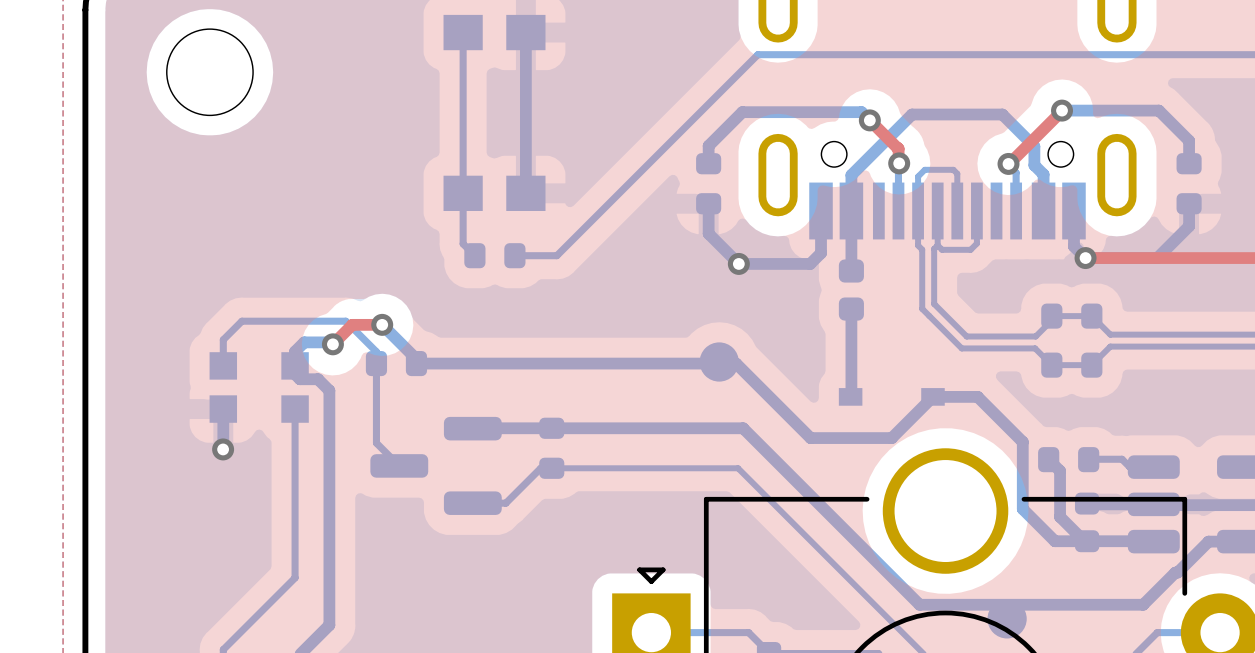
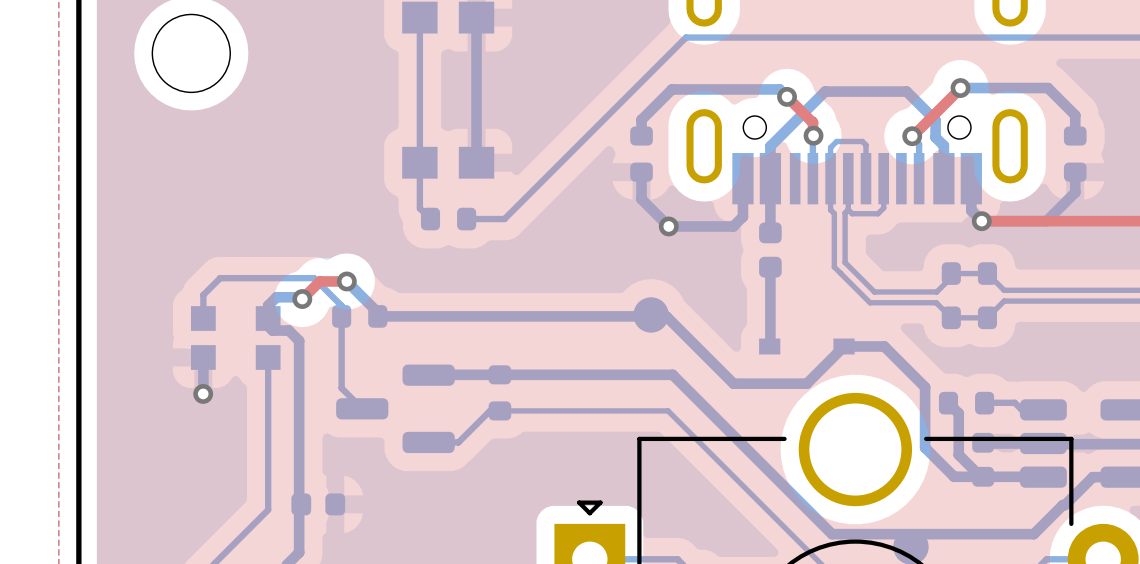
part: none -> (318, 504)

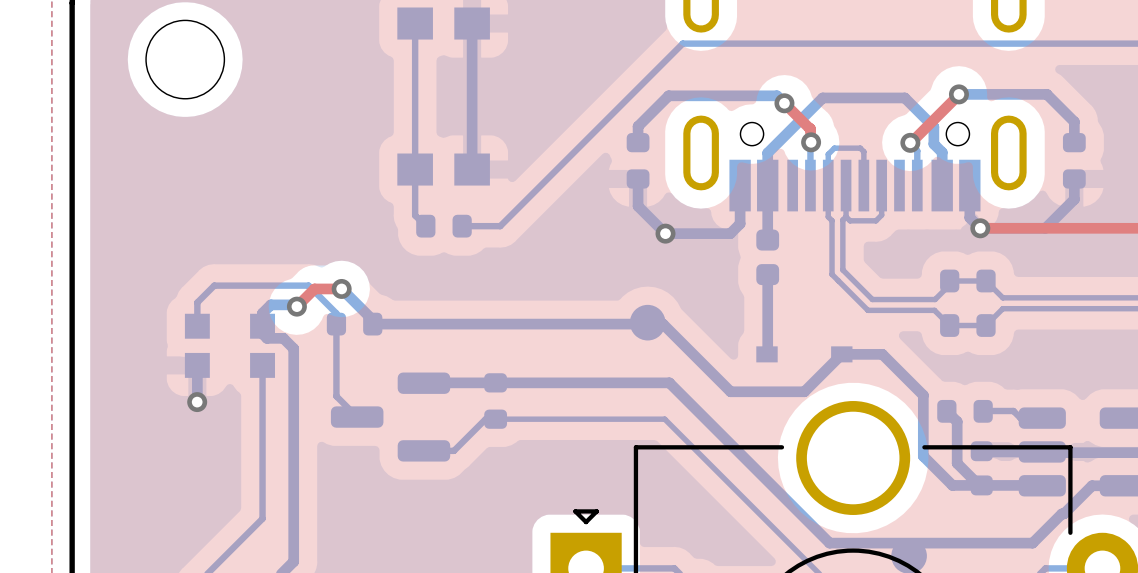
part: (318, 504) -> none

